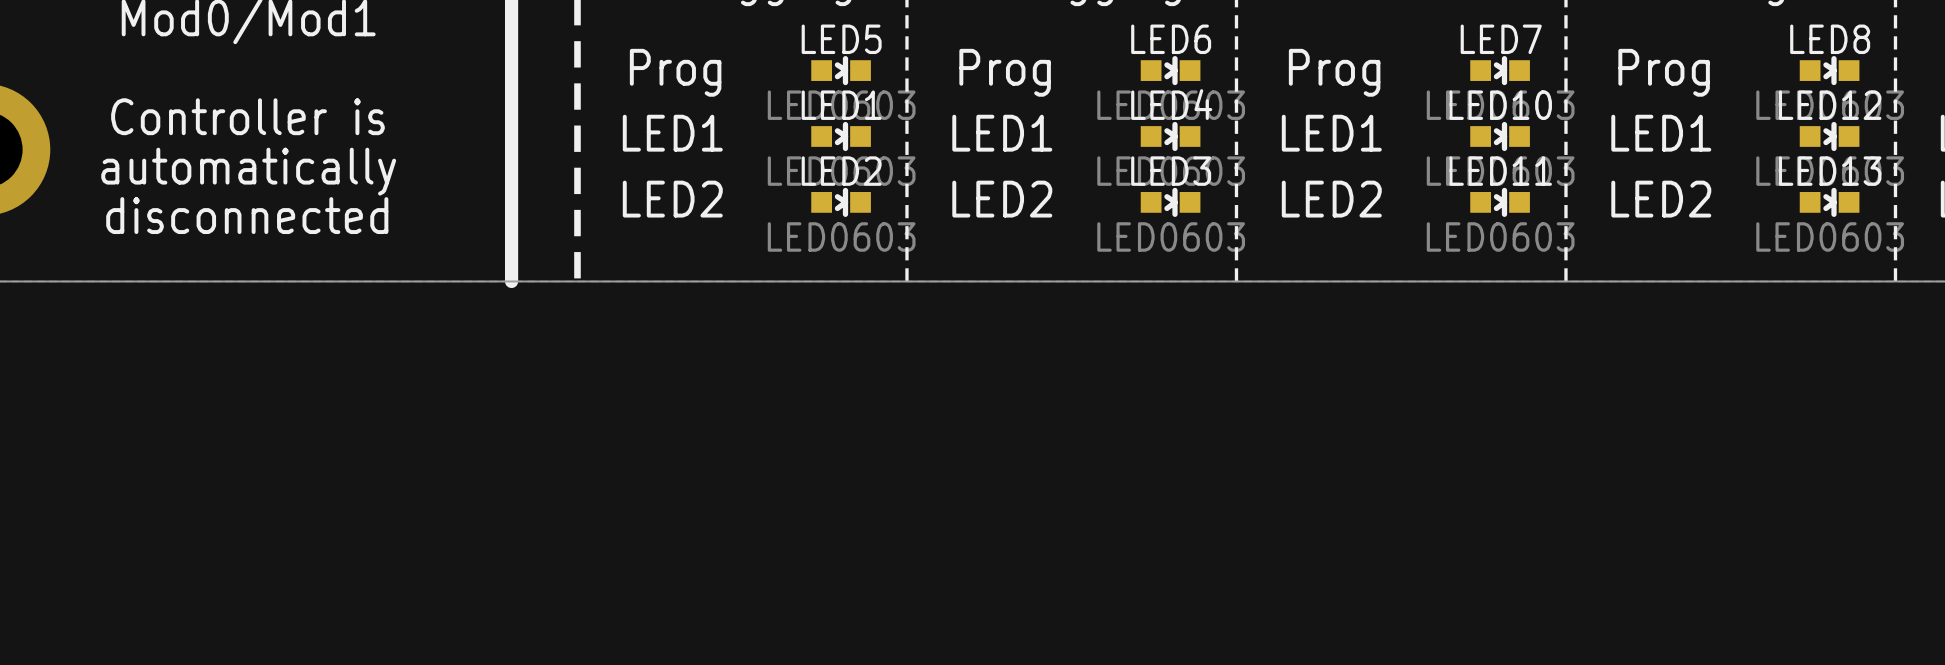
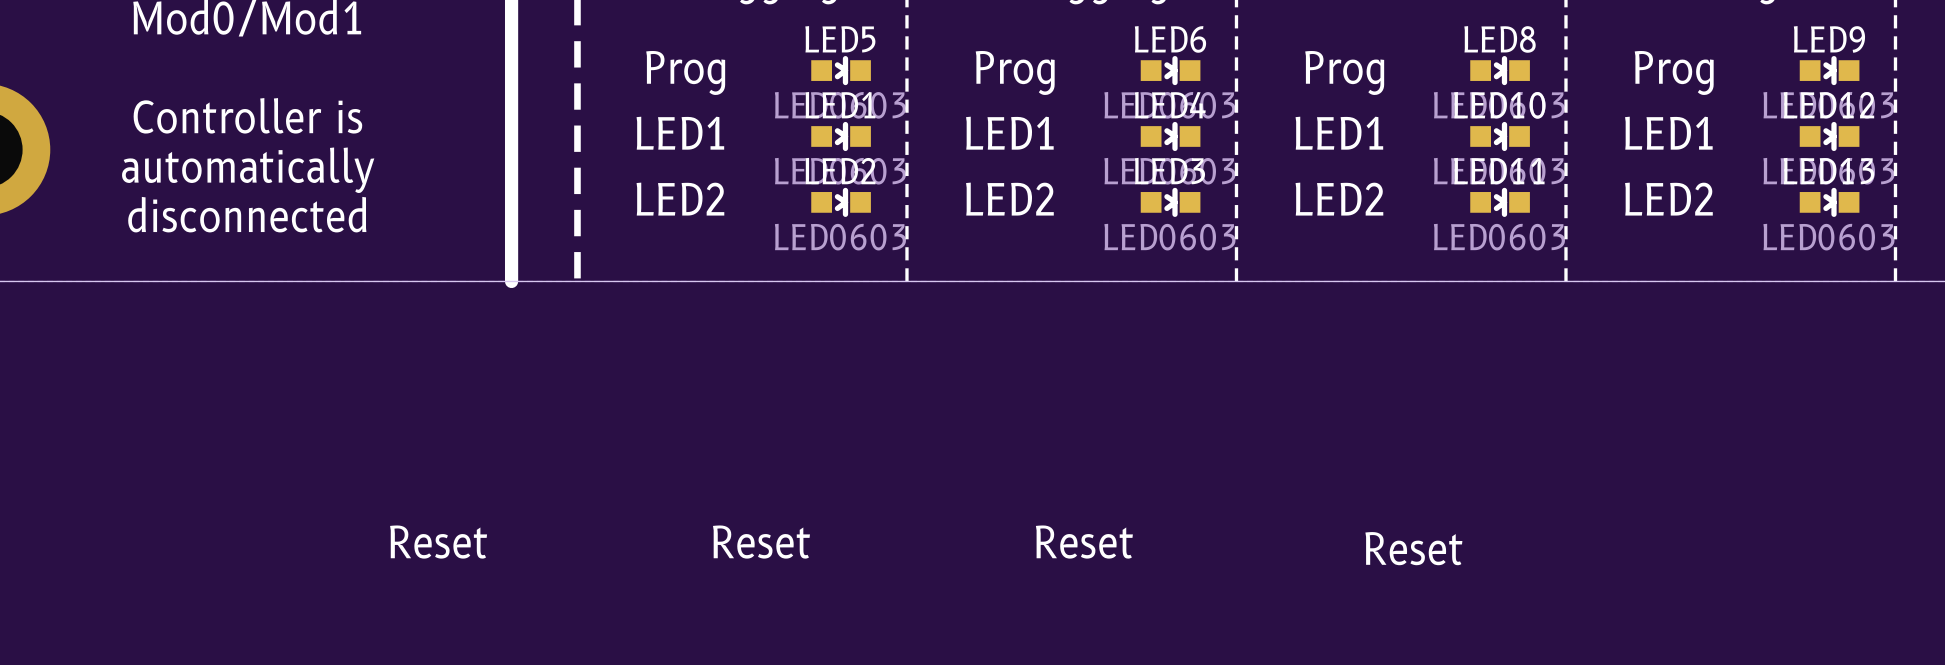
LED7 name: LED7 (1501, 39) -> LED8 (1500, 39)
LED8 name: LED8 (1830, 39) -> LED9 (1829, 39)
text: none -> Reset (438, 542)
text: none -> Reset (761, 542)
text: none -> Reset (1084, 542)
text: none -> Reset (1413, 548)

